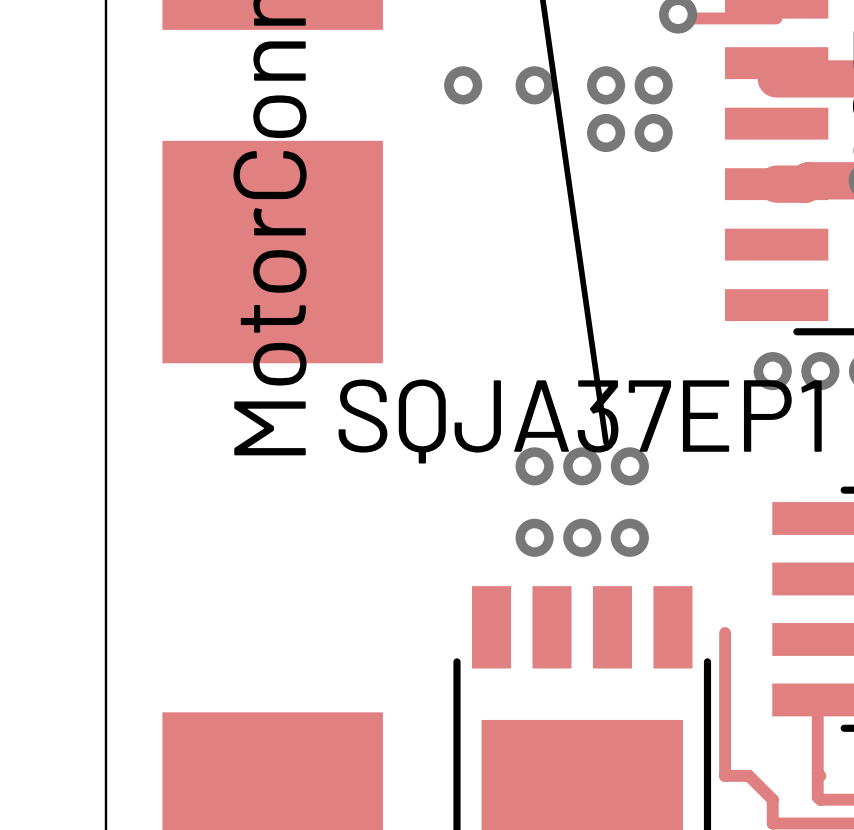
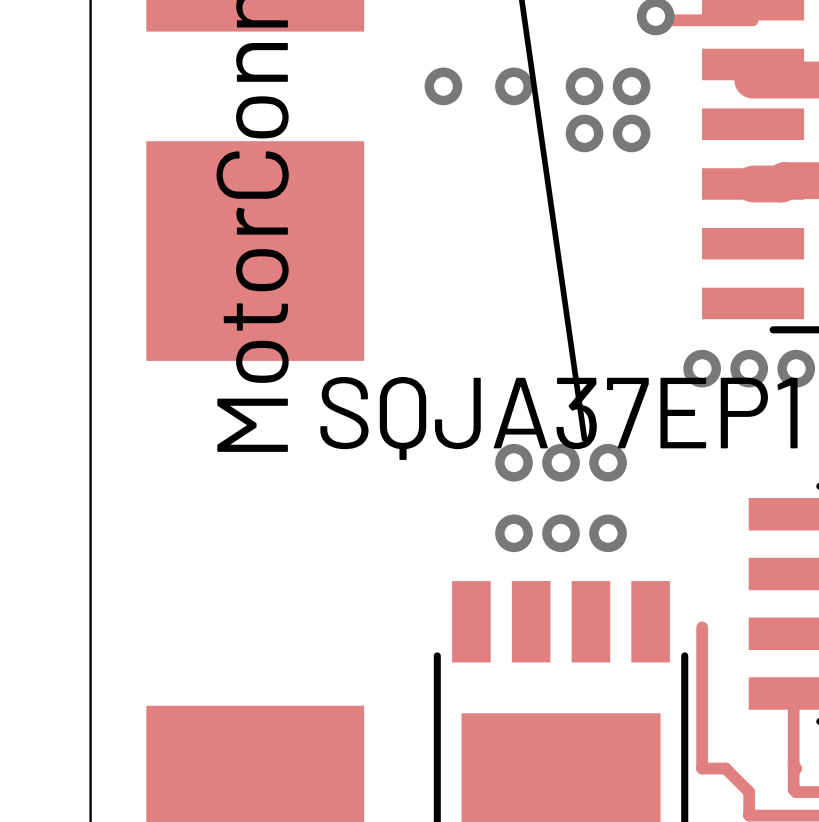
via: none -> (702, 368)

